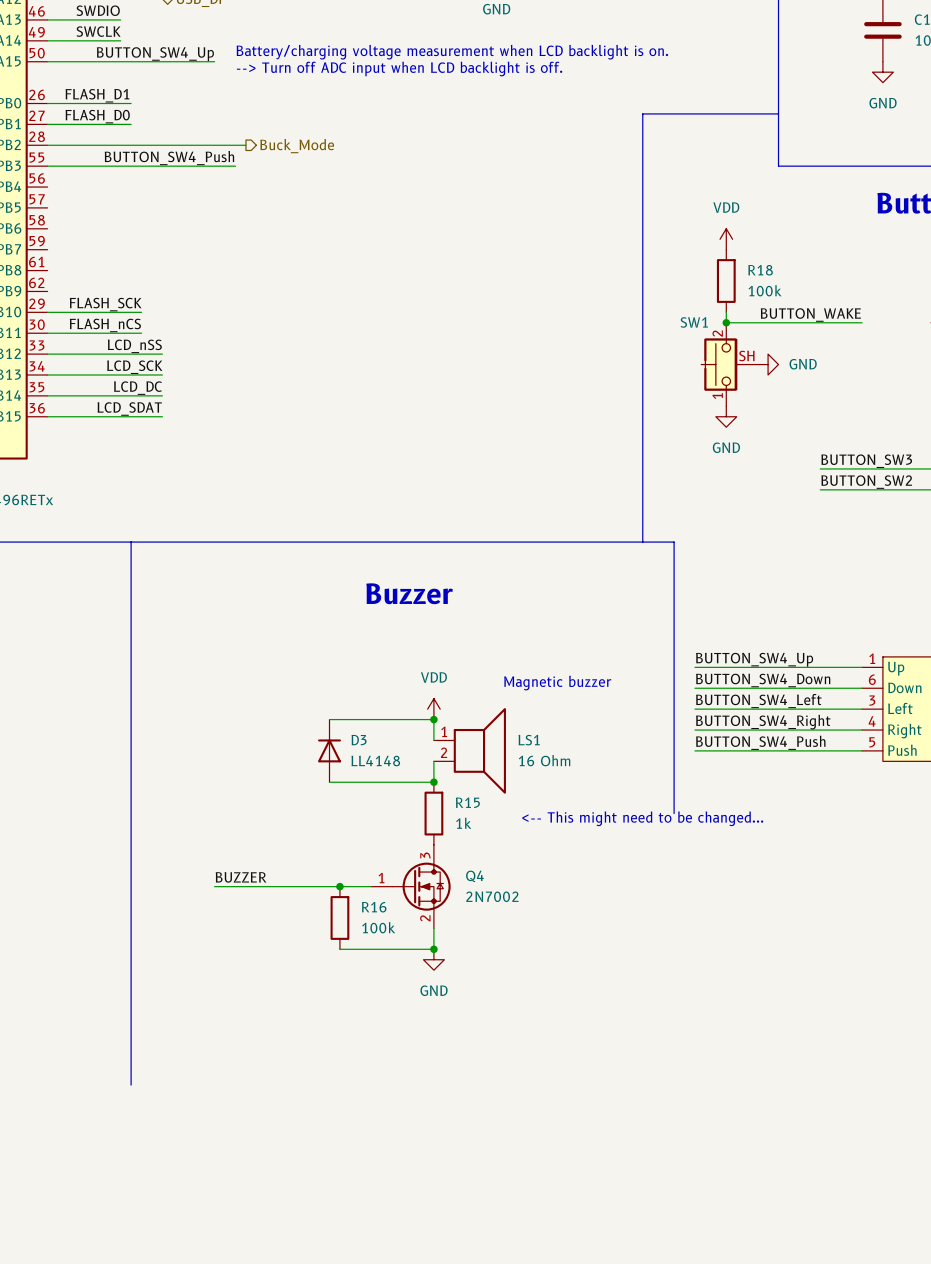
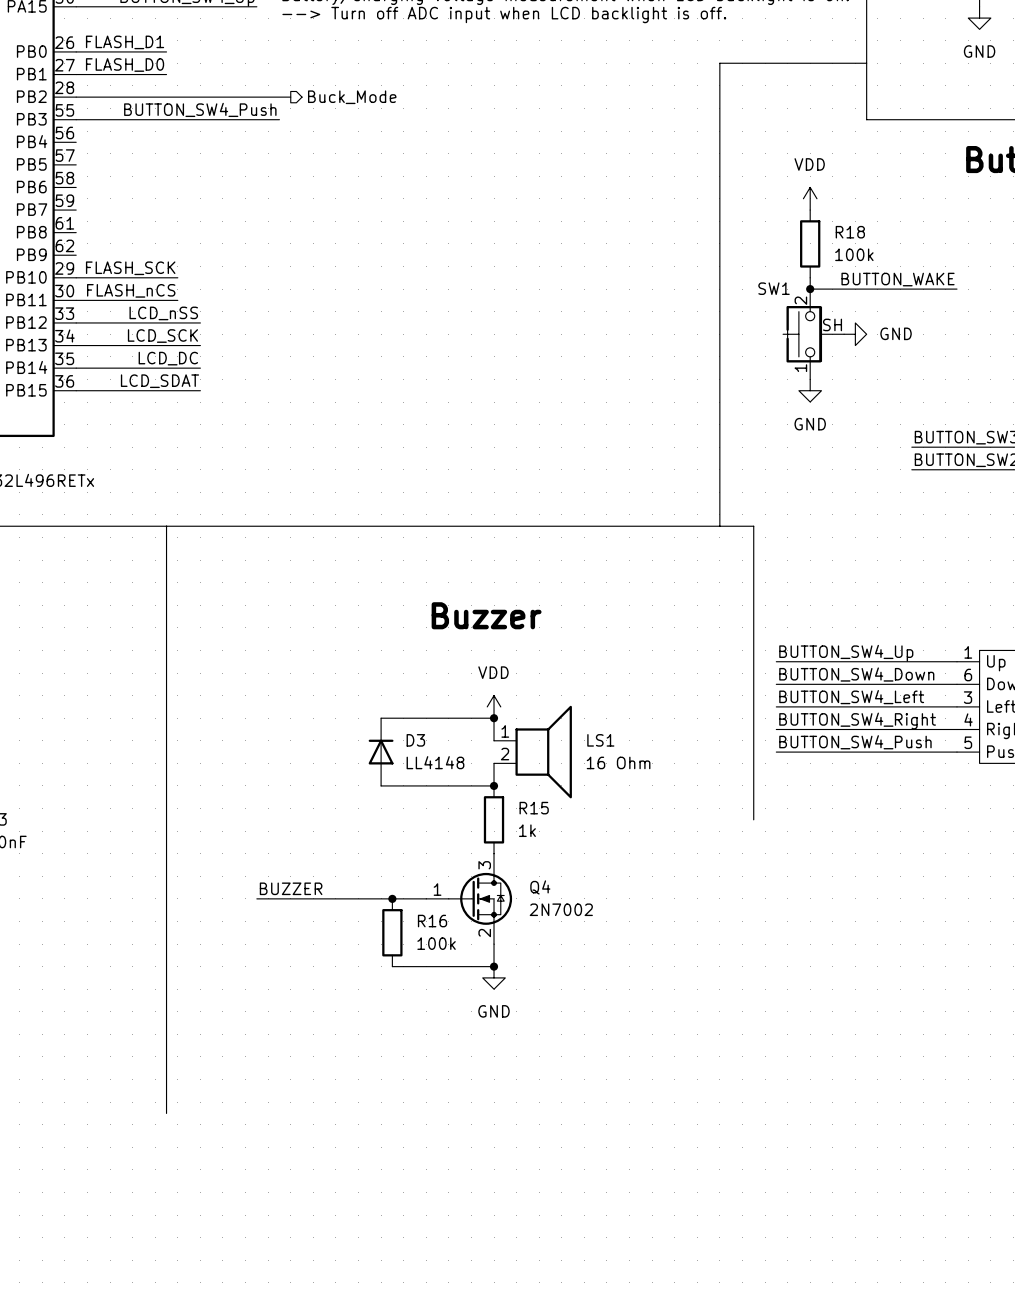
text position: Buzzer (409, 593) -> Buzzer (486, 615)
text: Magnetic buzzer (557, 683) -> none
text: <-- This might need to be changed... (642, 818) -> none

